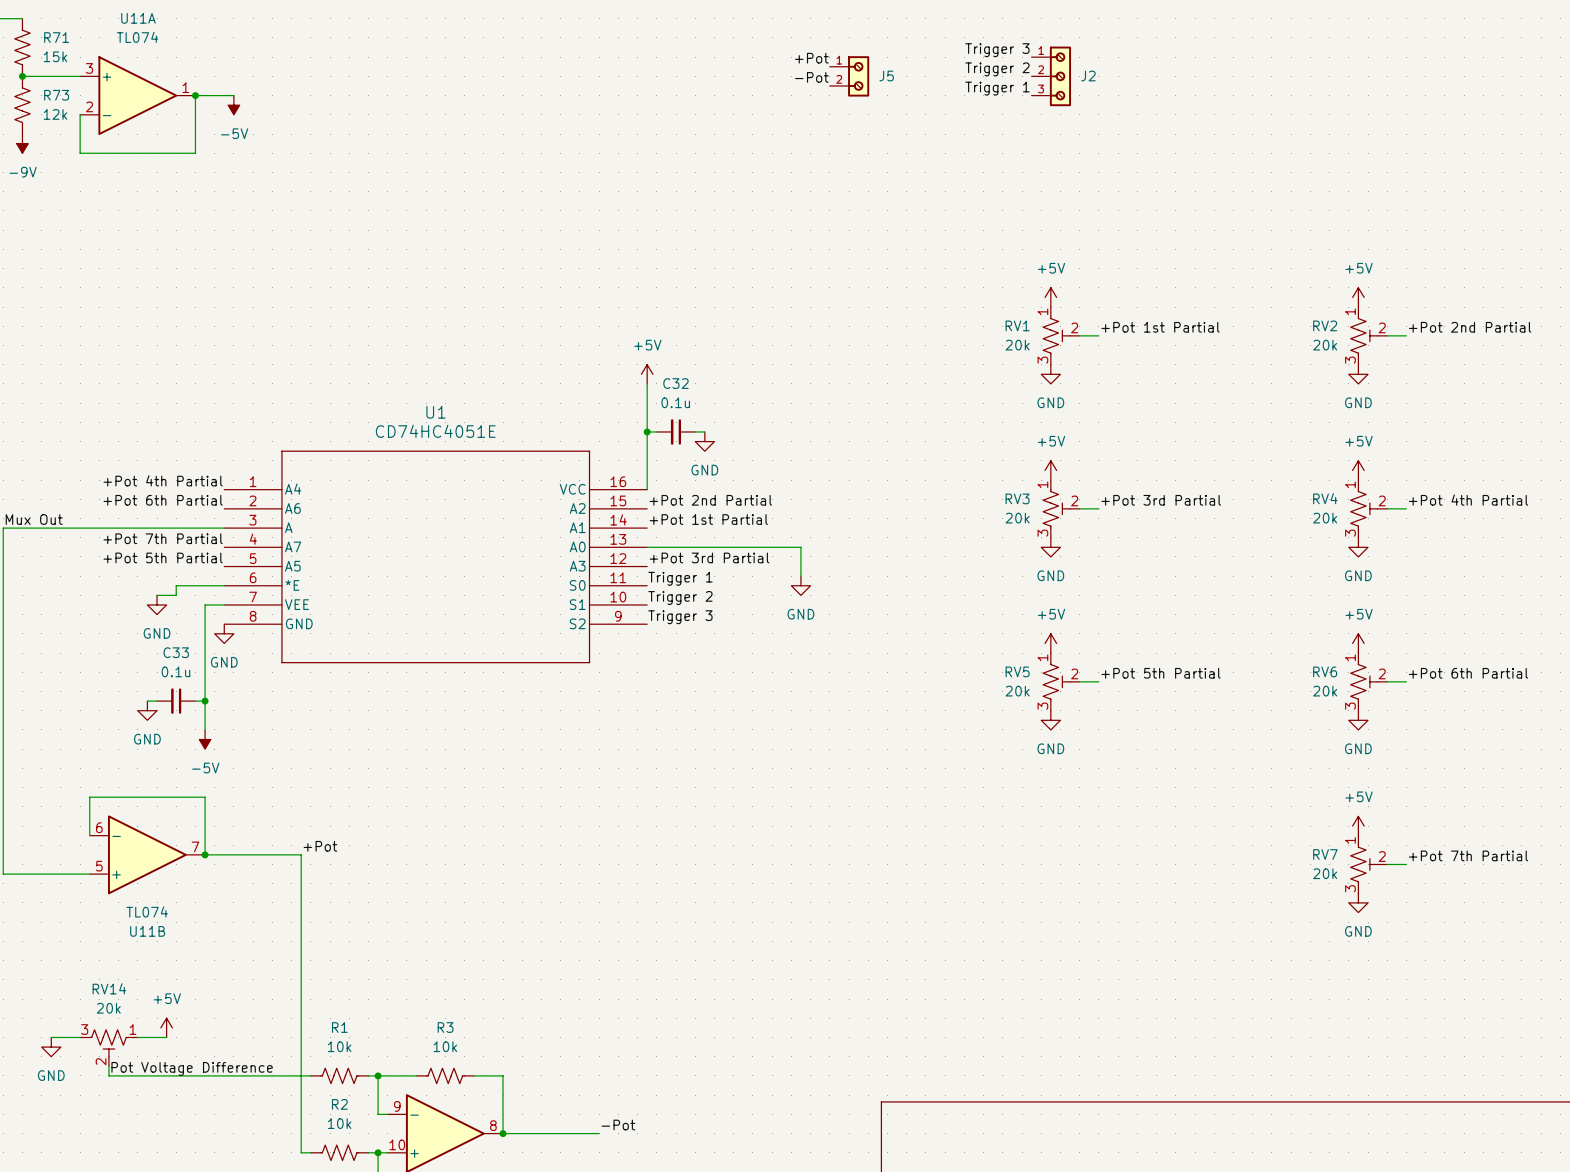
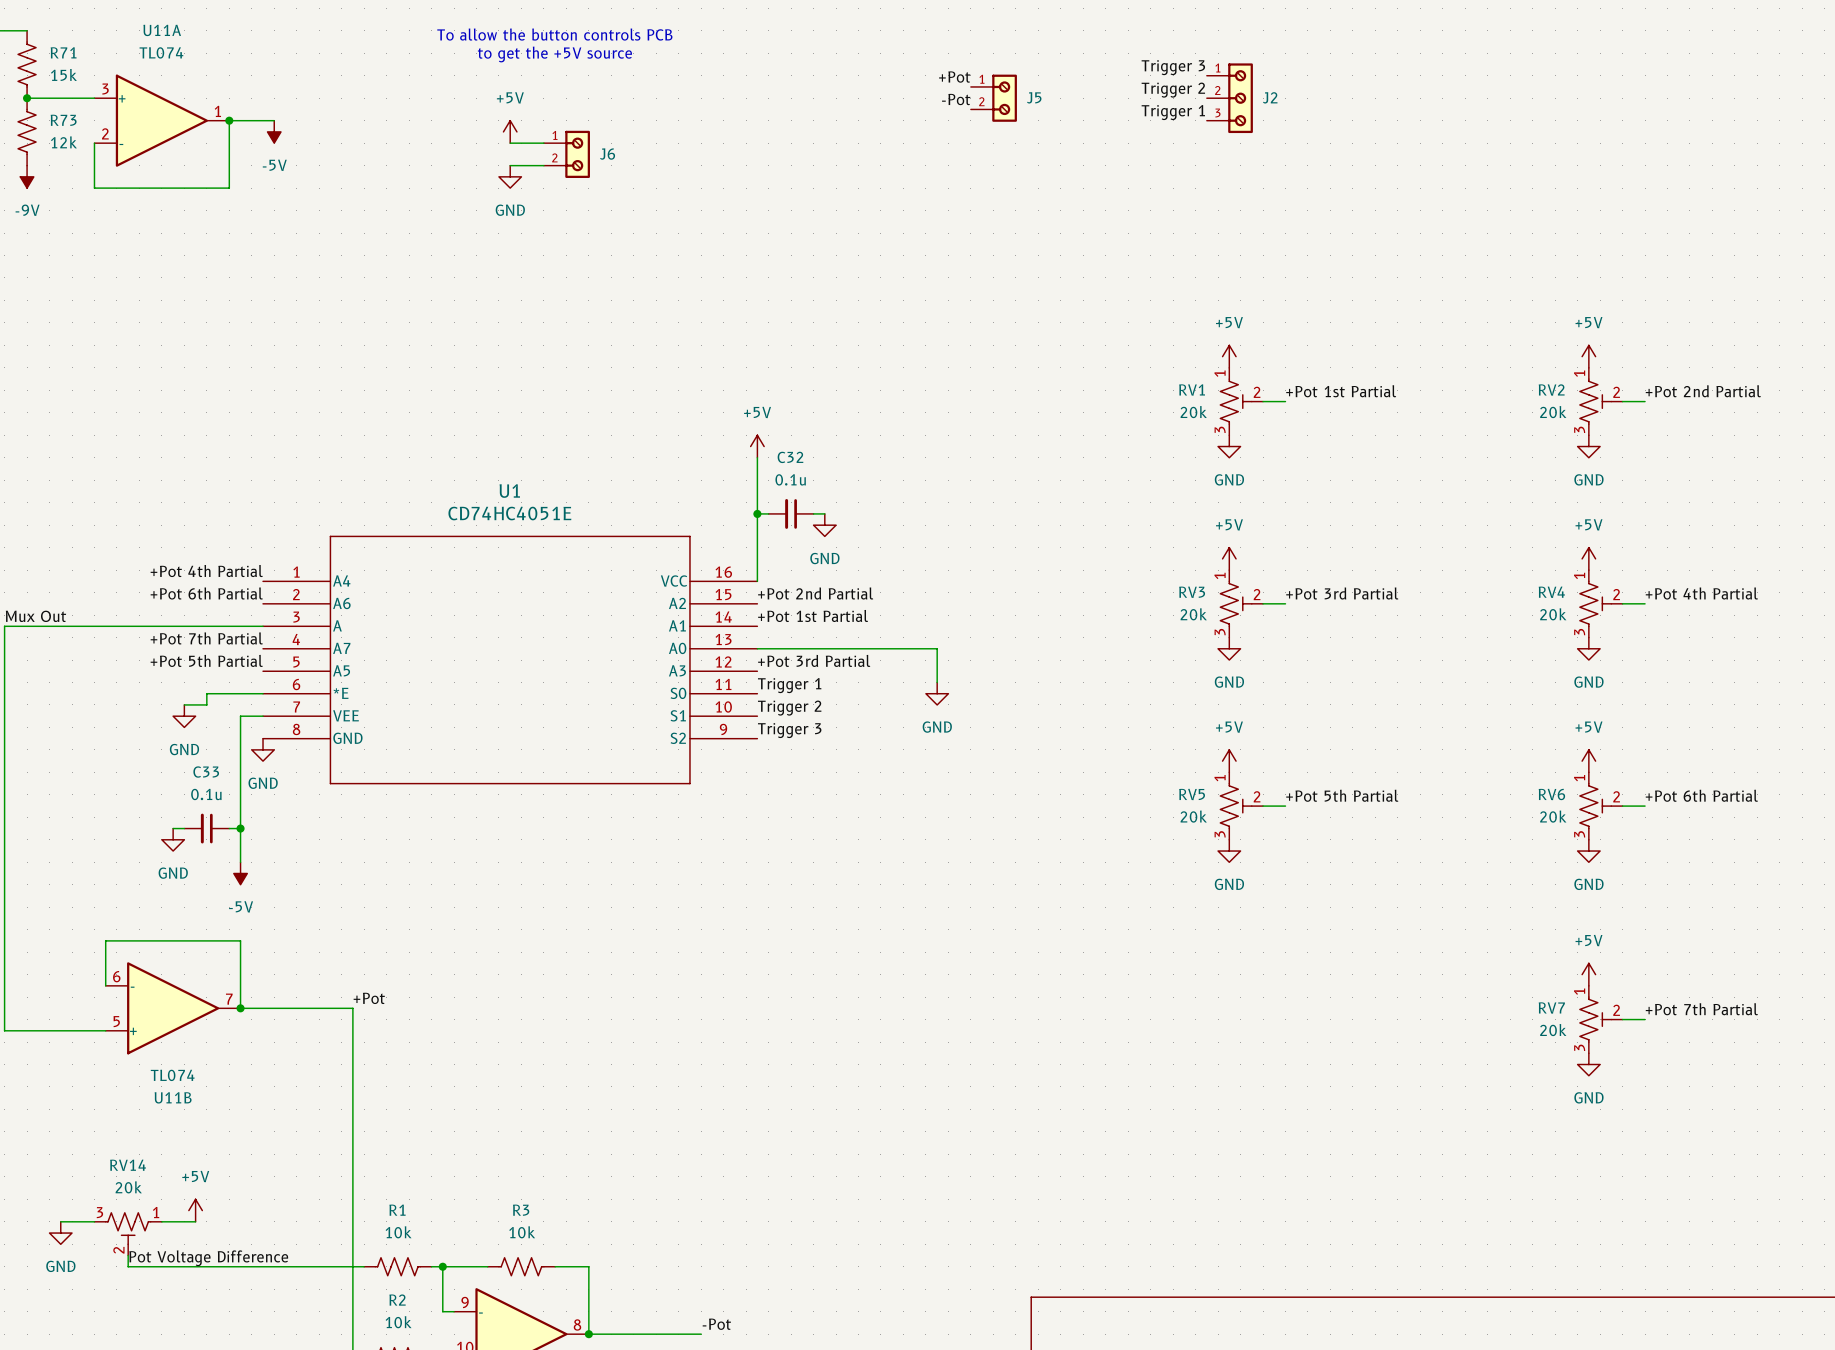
text: none -> To allow the button controls PCB (554, 34)
text: none -> to get the +5V source (554, 54)
power symbol: none -> +5V (510, 131)
wire: none -> (510, 143) (543, 143)
J6: none -> (566, 154)
wire: none -> (510, 165) (543, 165)
power symbol: none -> GND (510, 176)

